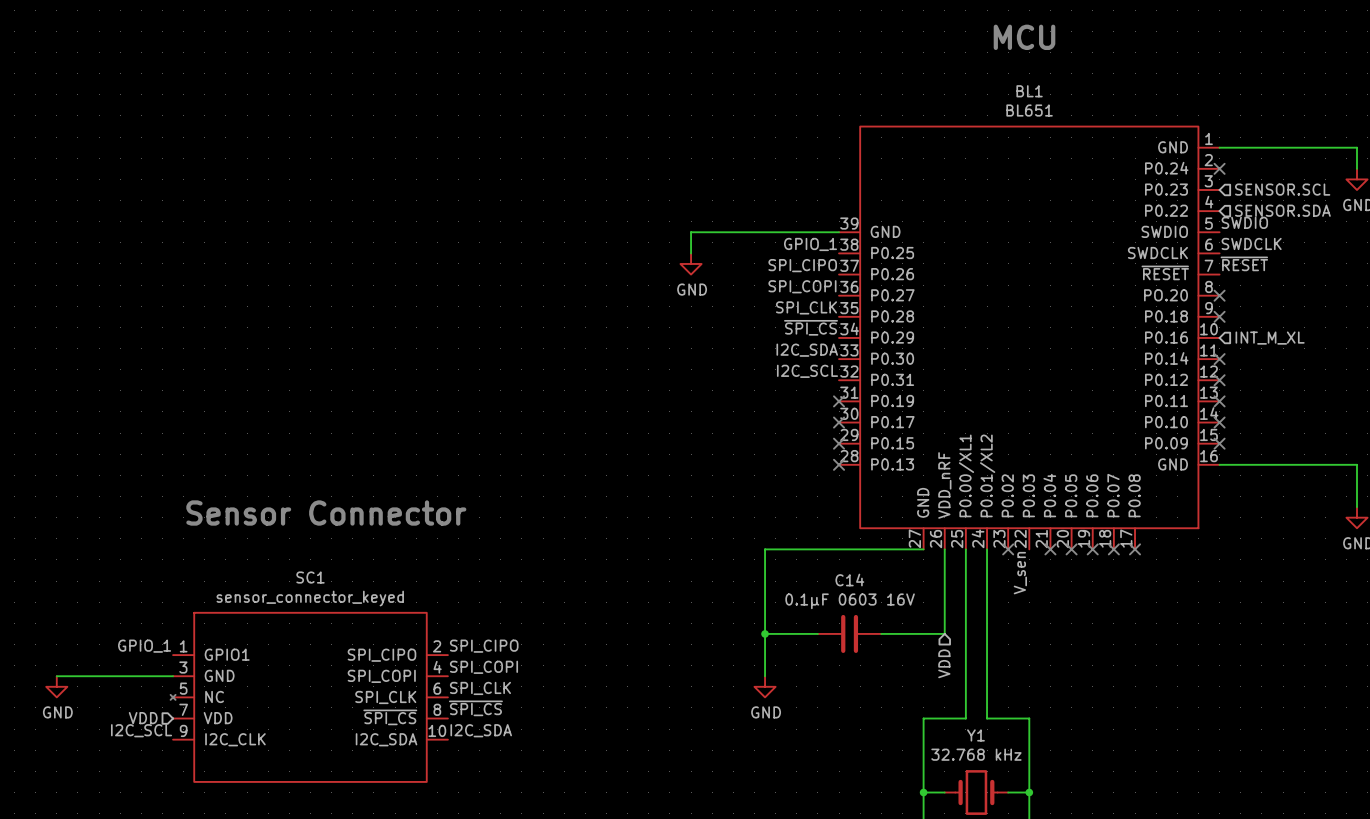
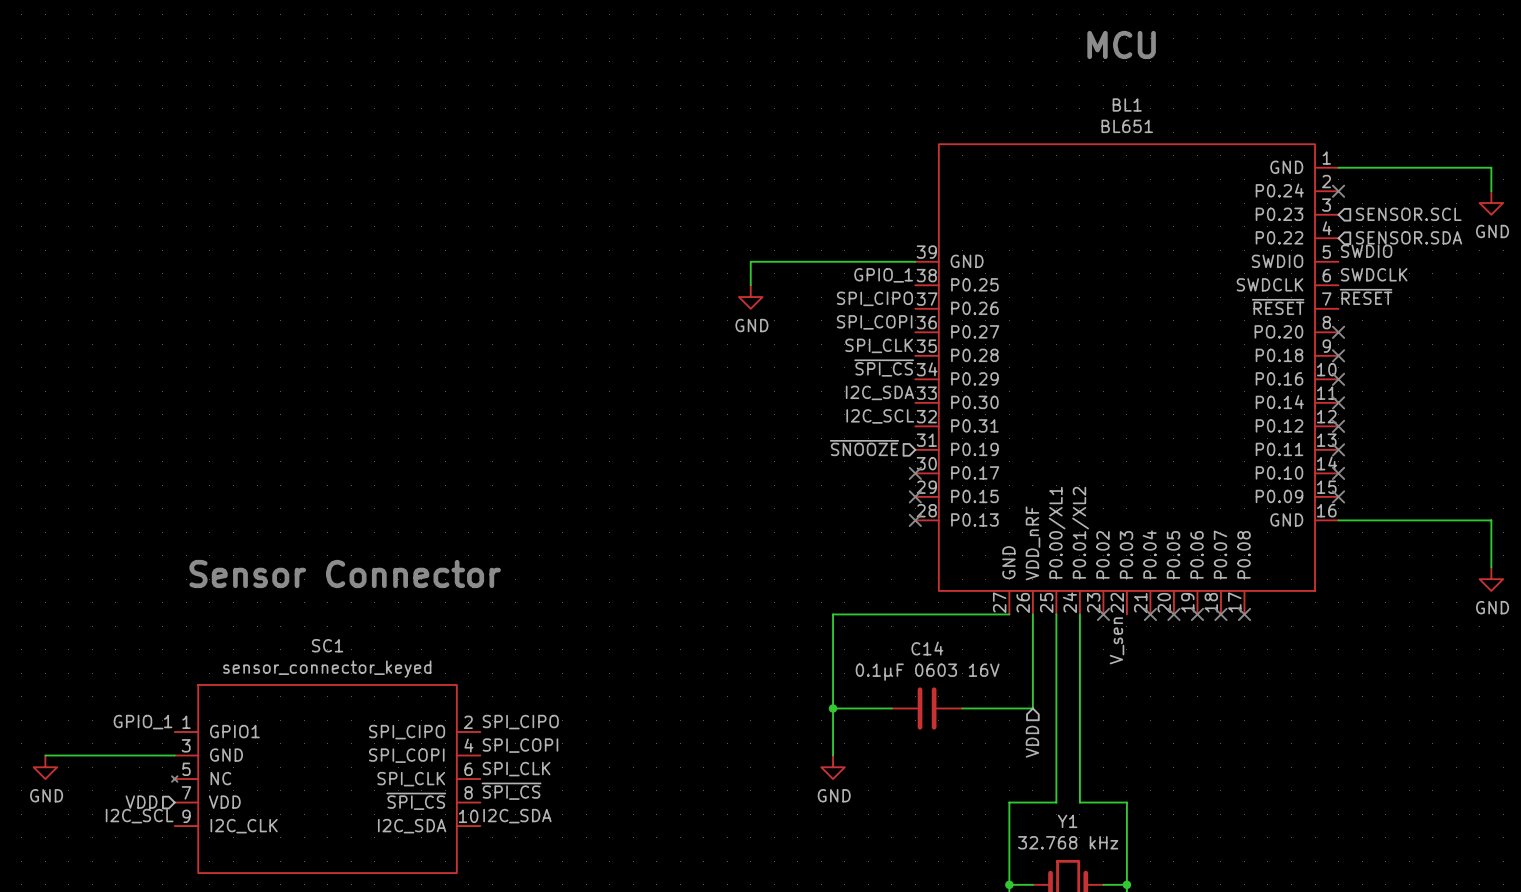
no-connect mark: none -> (1338, 379)
hierarchical label: INT_M_XL (1270, 338) -> none
hierarchical label: none -> ~{SNOOZE} (864, 448)
no-connect mark: (839, 401) -> none

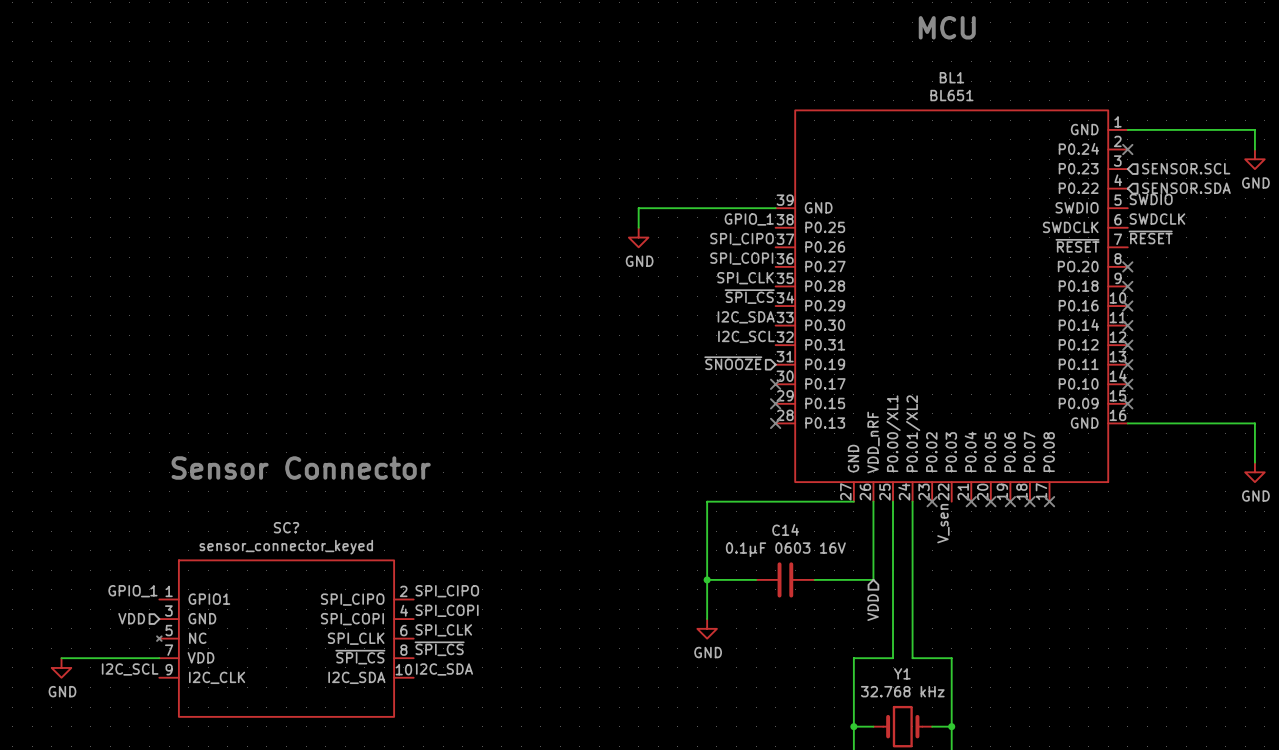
SC1 name: SC1 (327, 645) -> SC? (286, 527)
wire: (45, 755) (174, 755) -> none
power symbol position: GND (45, 767) -> GND (61, 667)
wire: none -> (61, 658) (159, 658)
hierarchical label position: VDD (141, 802) -> VDD (131, 618)

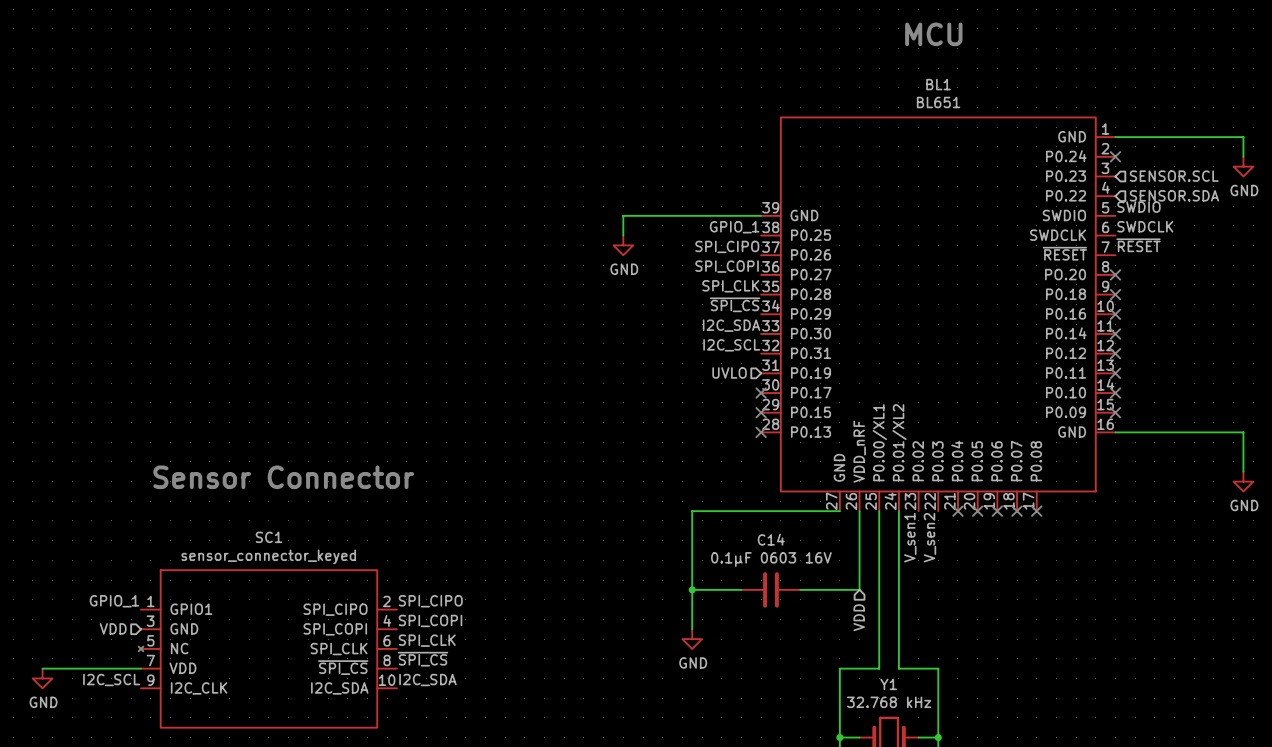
hierarchical label: ~{SNOOZE} (733, 363) -> UVLO (729, 372)
no-connect mark: (932, 501) -> none
label: V_sen (943, 523) -> V_sen2 (929, 537)
SC? name: SC? (286, 527) -> SC1 (268, 537)
label: none -> V_sen1 (910, 537)

